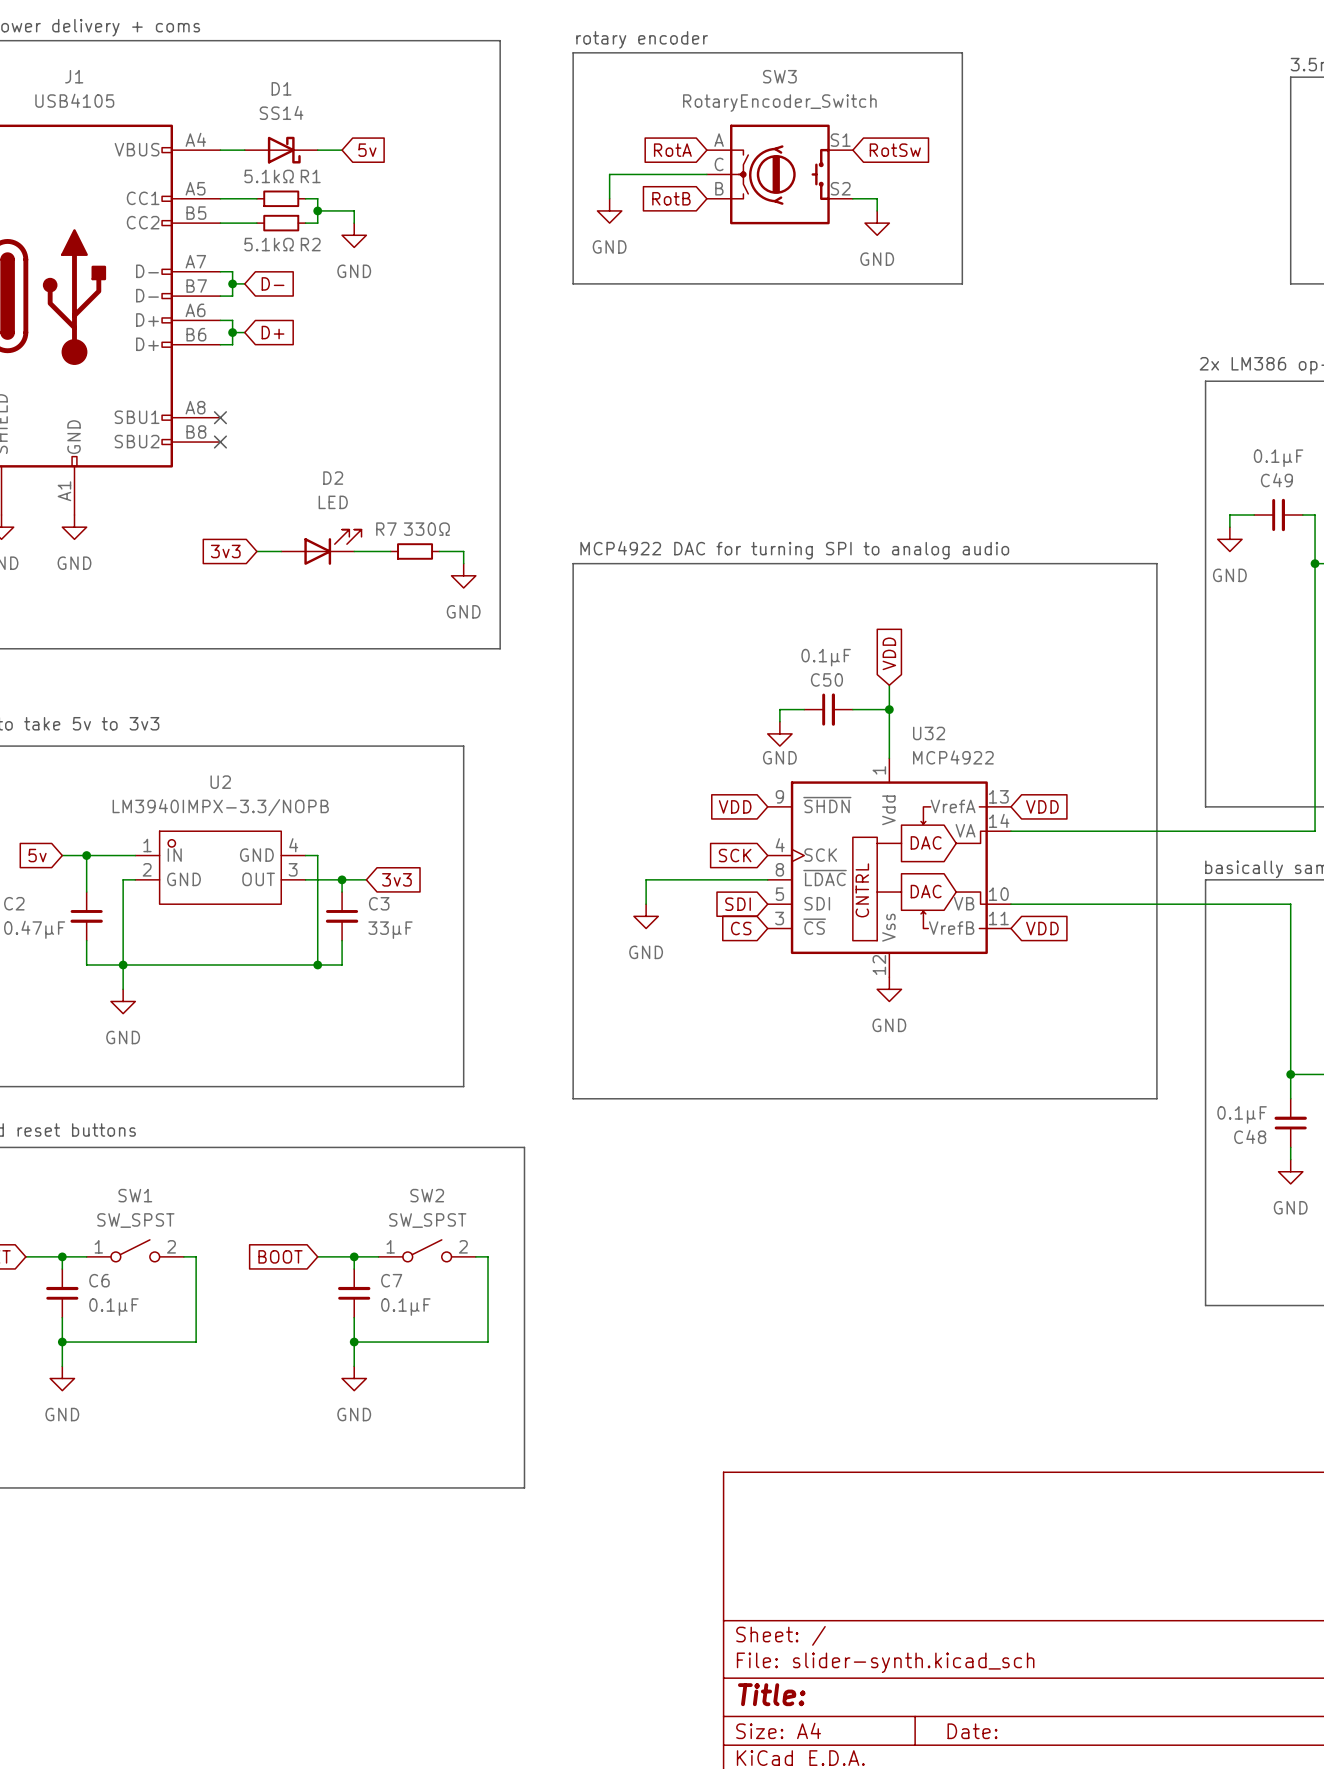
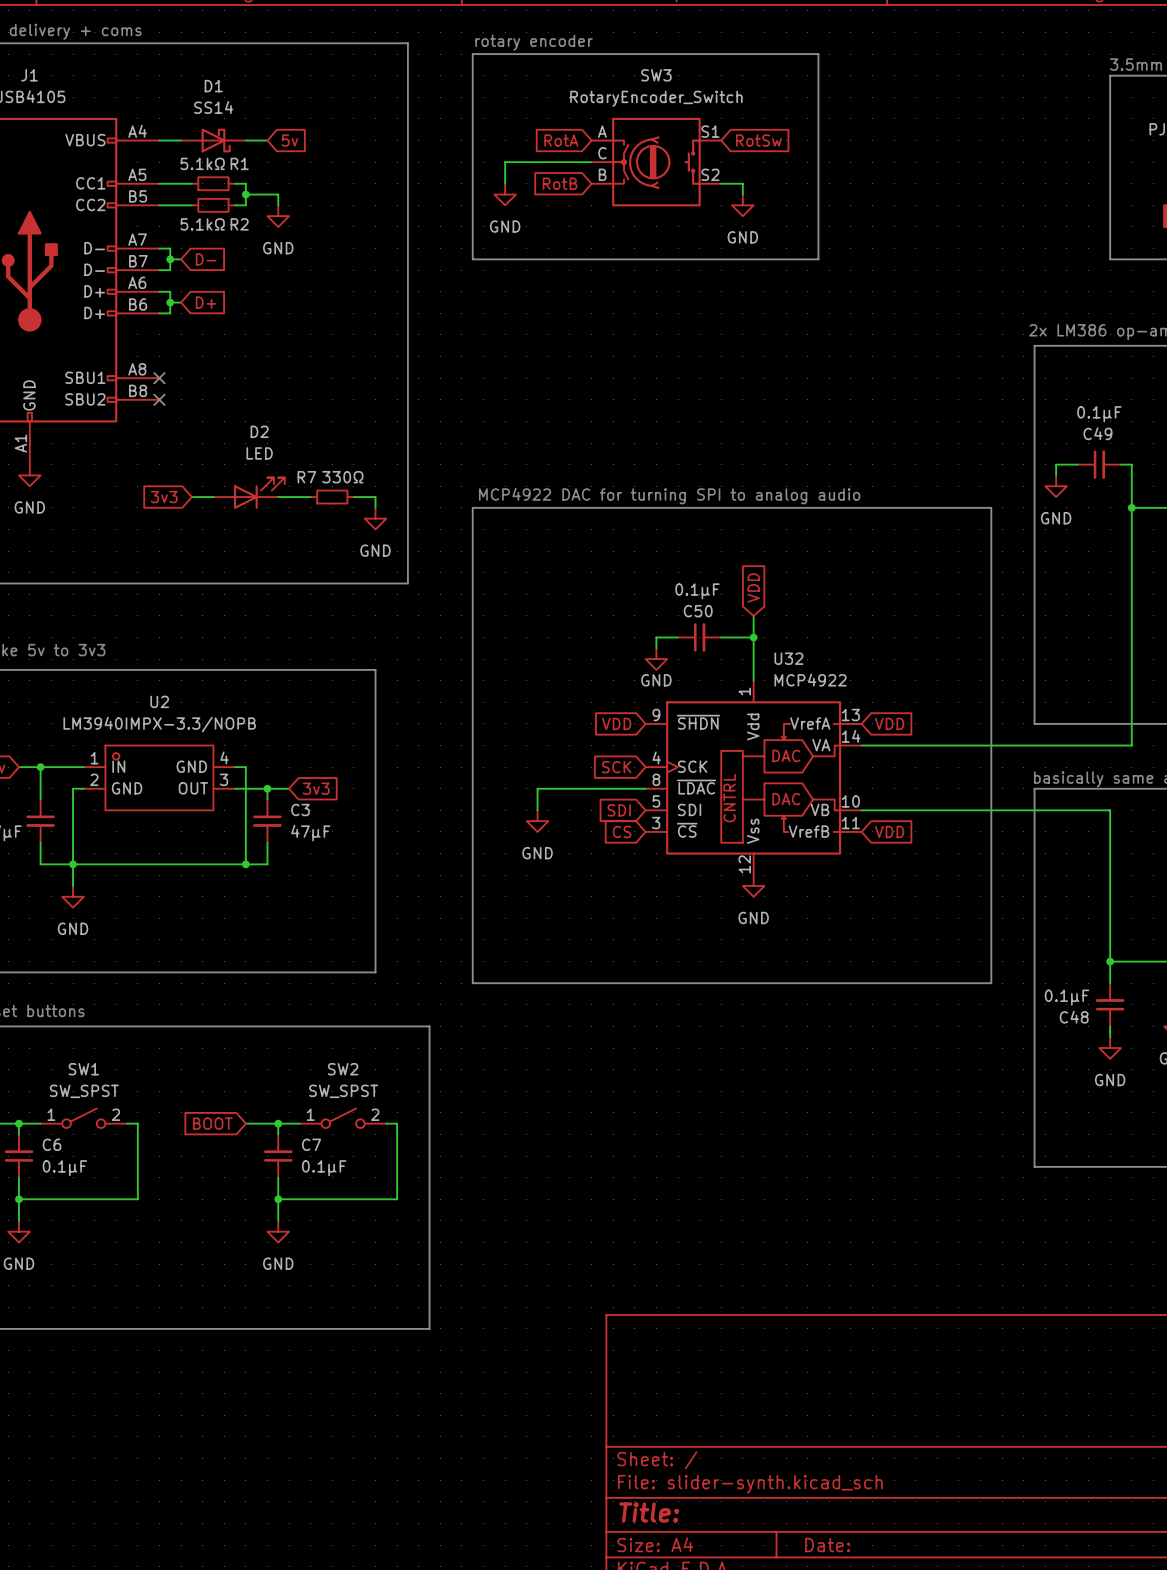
C3 value: 33μF (390, 930) -> 47μF (310, 833)

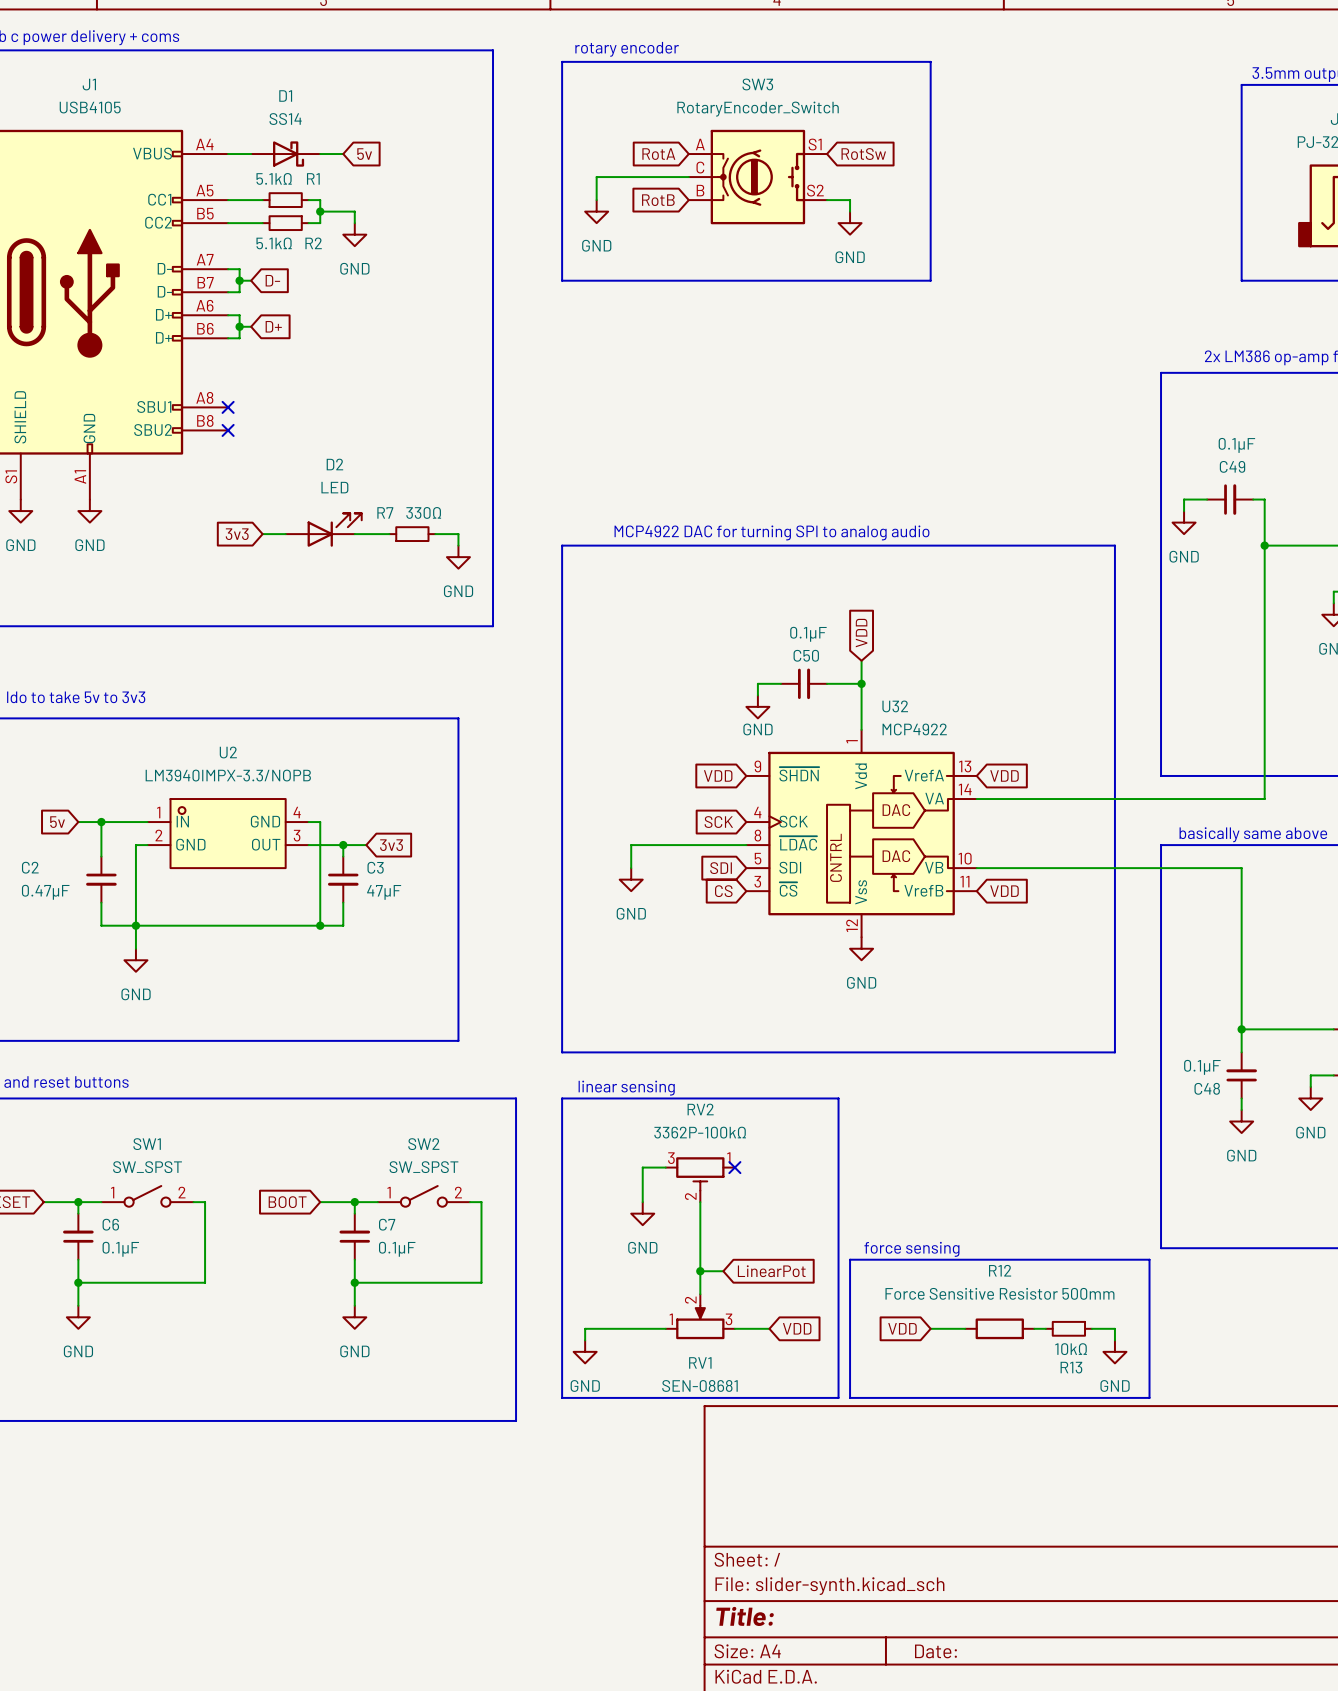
text: none -> linear sensing (626, 1088)
line: none -> (562, 1098) (838, 1098) (838, 1397) (562, 1397) (562, 1098)
wire: none -> (665, 1167) (642, 1167) (642, 1202)
no-connect mark: none -> (734, 1167)
RV2: none -> 3362P-100kΩ (700, 1179)
wire: none -> (700, 1202) (700, 1294)
power symbol: none -> GND (642, 1213)
text: none -> force sensing (911, 1249)
line: none -> (850, 1259) (1149, 1259) (1149, 1397) (850, 1397) (850, 1259)
wire: none -> (700, 1271) (723, 1271)
junction: none -> (700, 1271)
global label: none -> LinearPot (771, 1271)
RV1: none -> SEN-08681 (700, 1316)
wire: none -> (665, 1328) (585, 1328) (585, 1340)
wire: none -> (734, 1328) (769, 1328)
global label: none -> VDD (797, 1328)
global label: none -> VDD (902, 1328)
wire: none -> (930, 1328) (965, 1328)
R12: none -> Force Sensitive Resistor 500mm (999, 1328)
wire: none -> (1034, 1328) (1045, 1328)
R13: none -> 10kΩ (1068, 1328)
wire: none -> (1091, 1328) (1114, 1328) (1114, 1340)
power symbol: none -> GND (585, 1351)
power symbol: none -> GND (1114, 1351)

